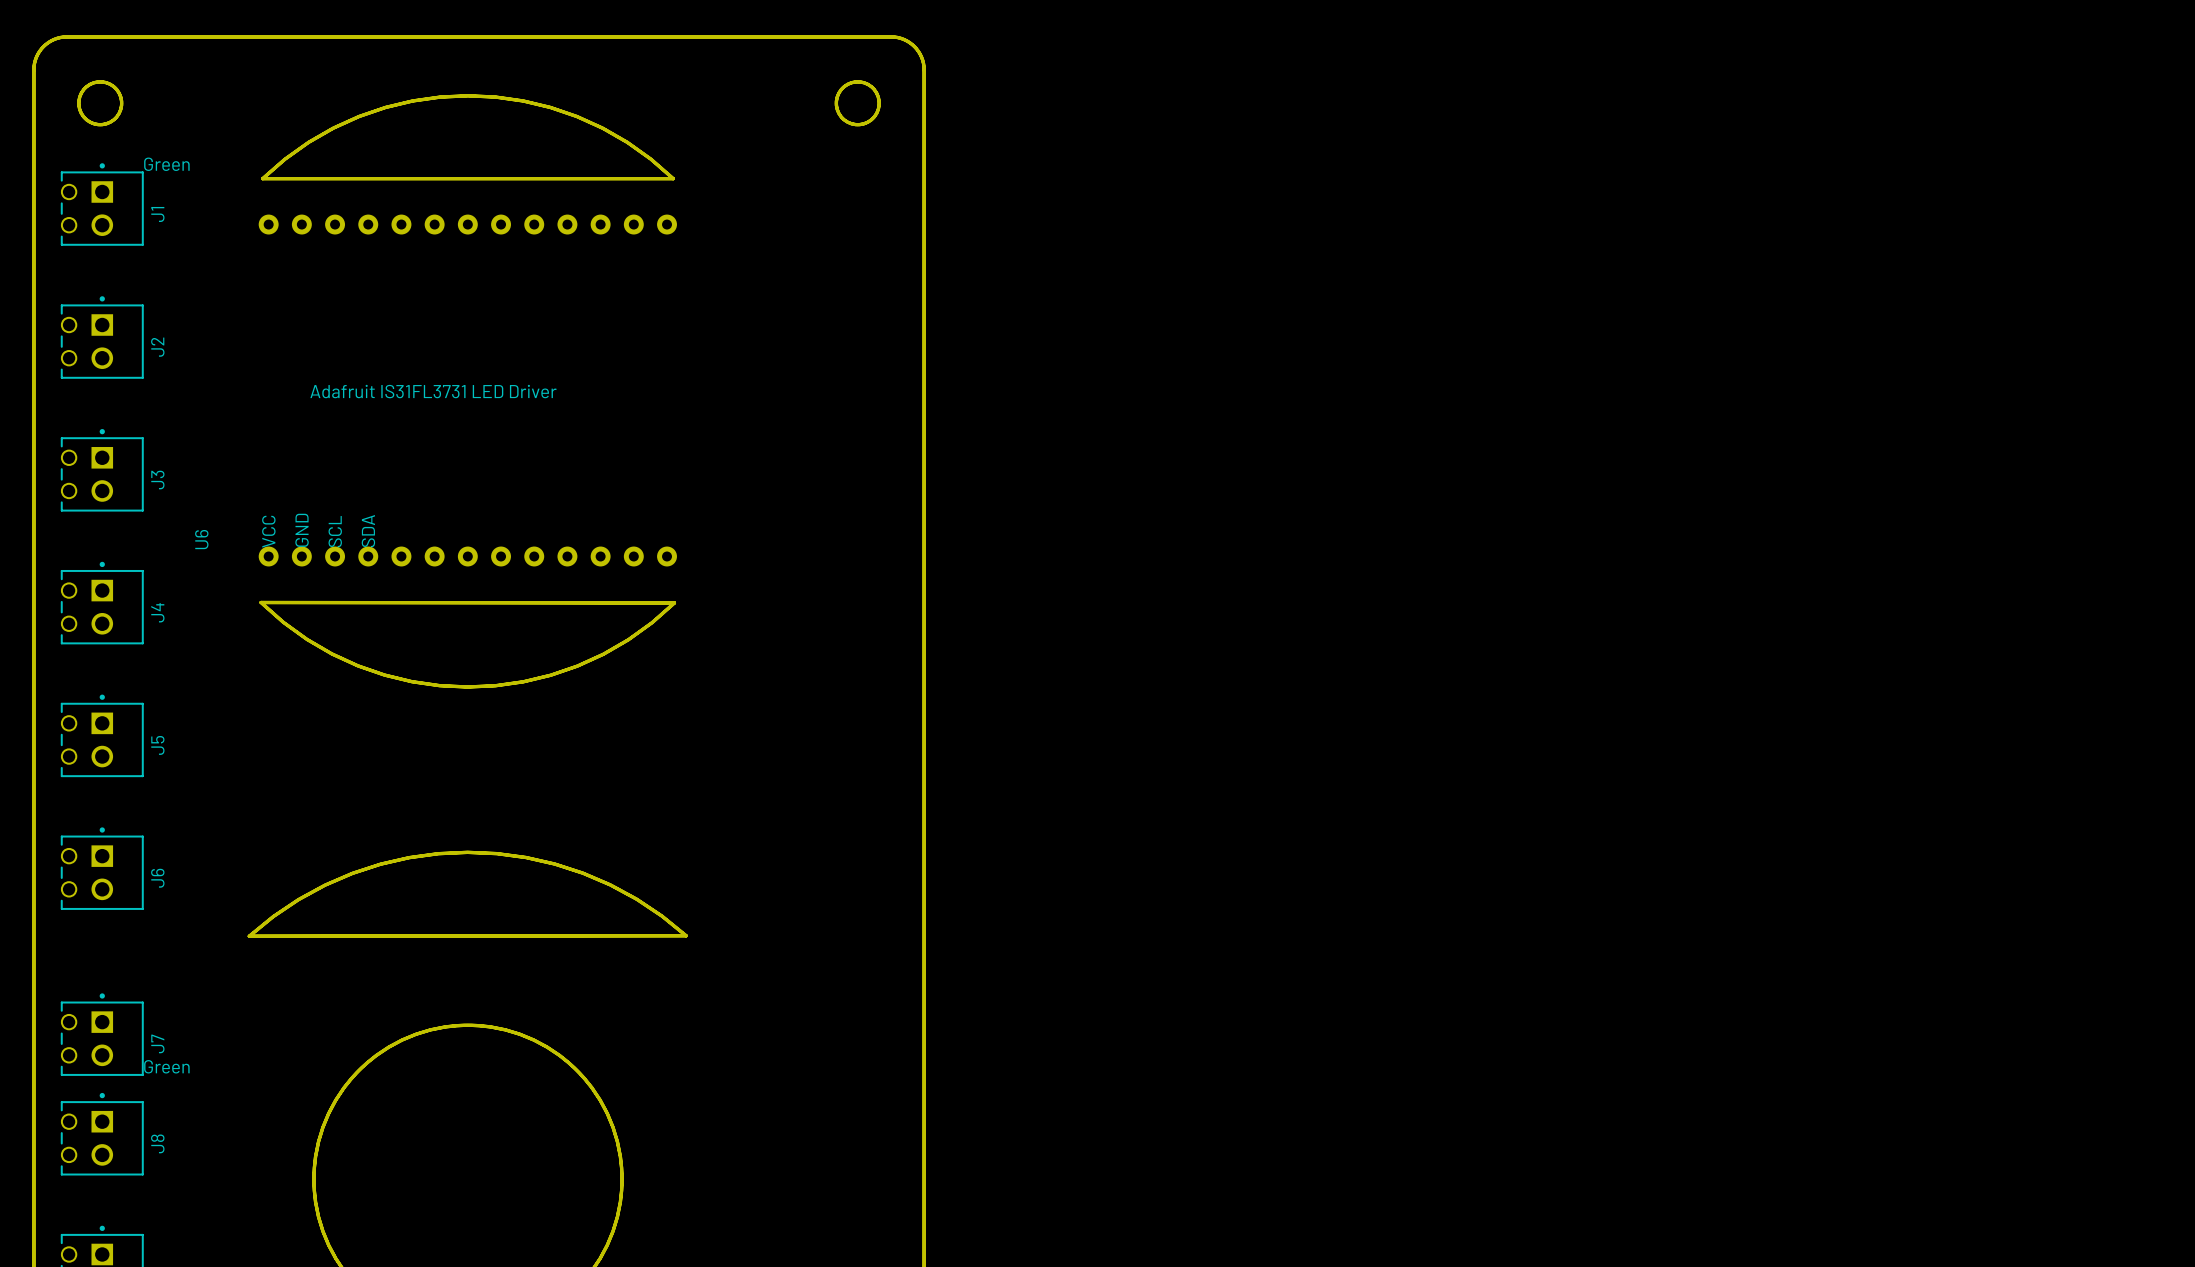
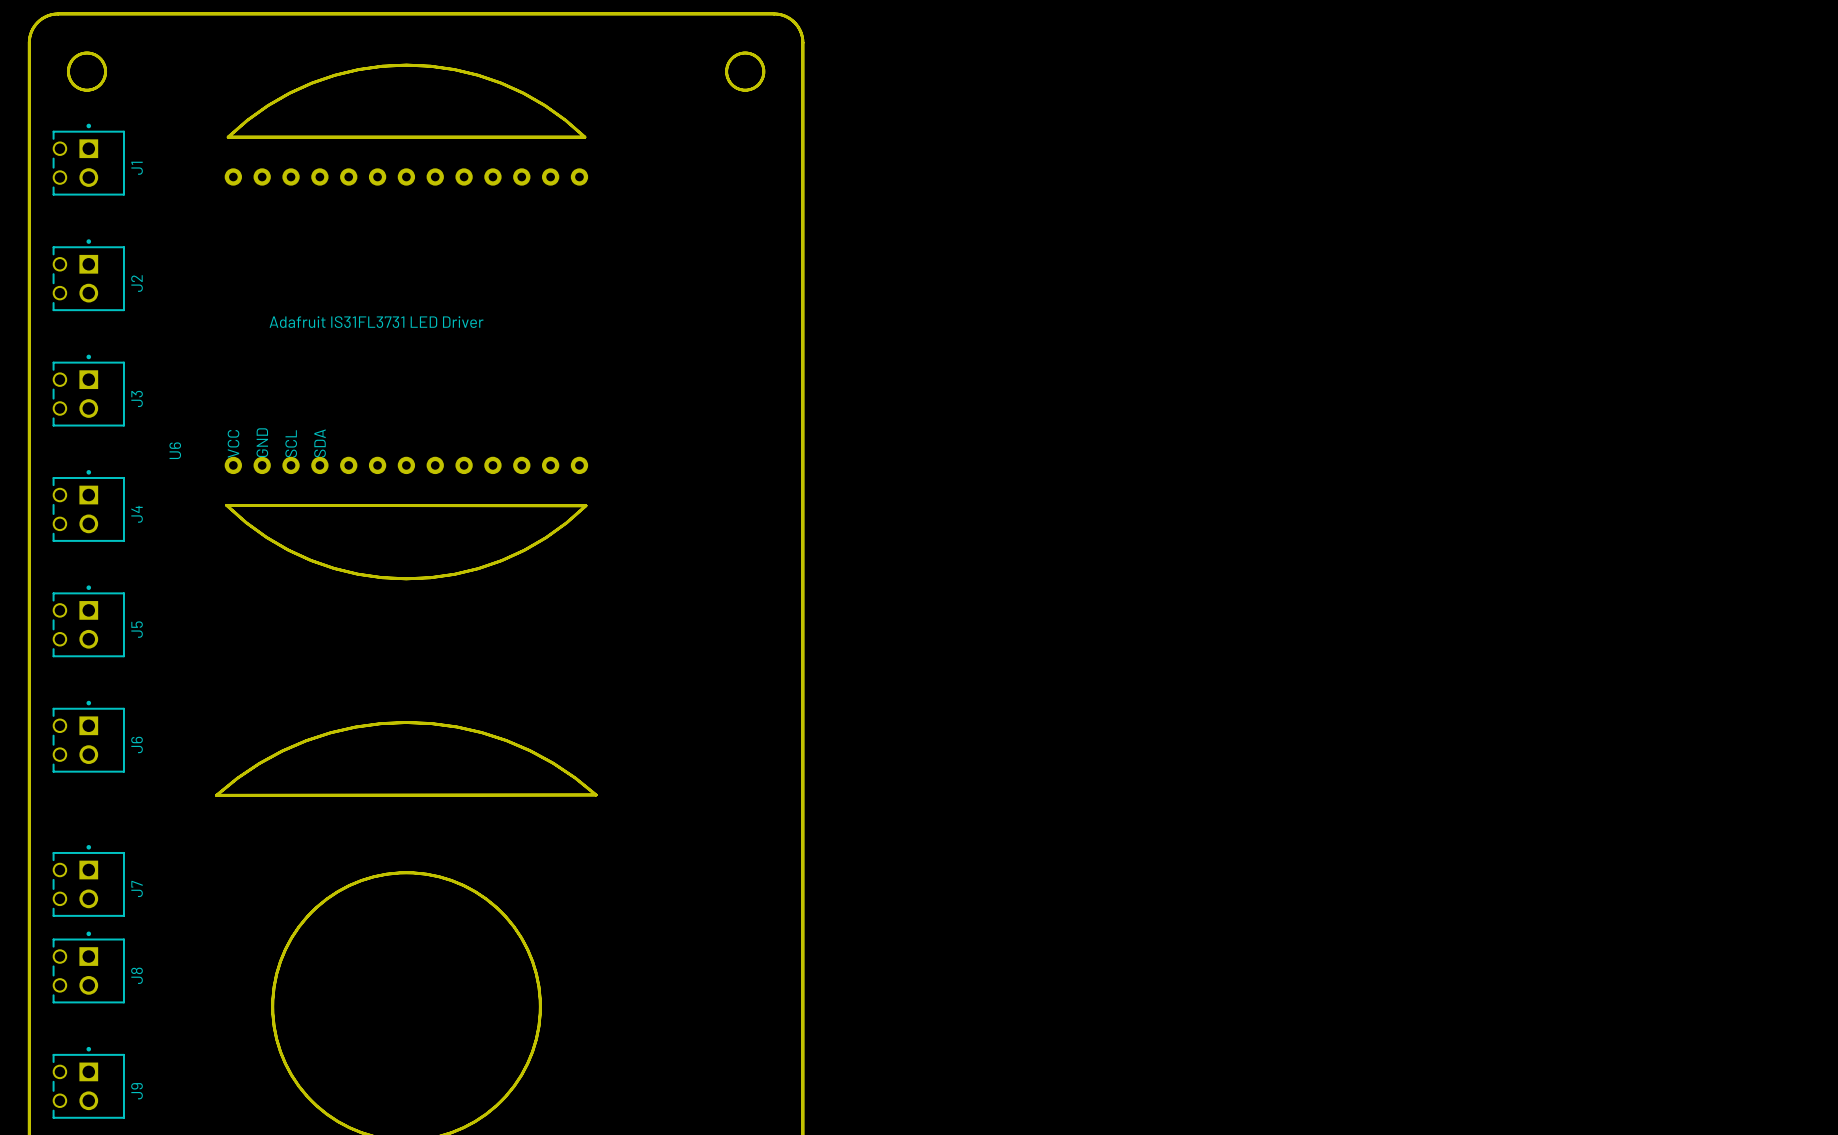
text: Green (166, 164) -> none
text: Green (166, 1066) -> none

